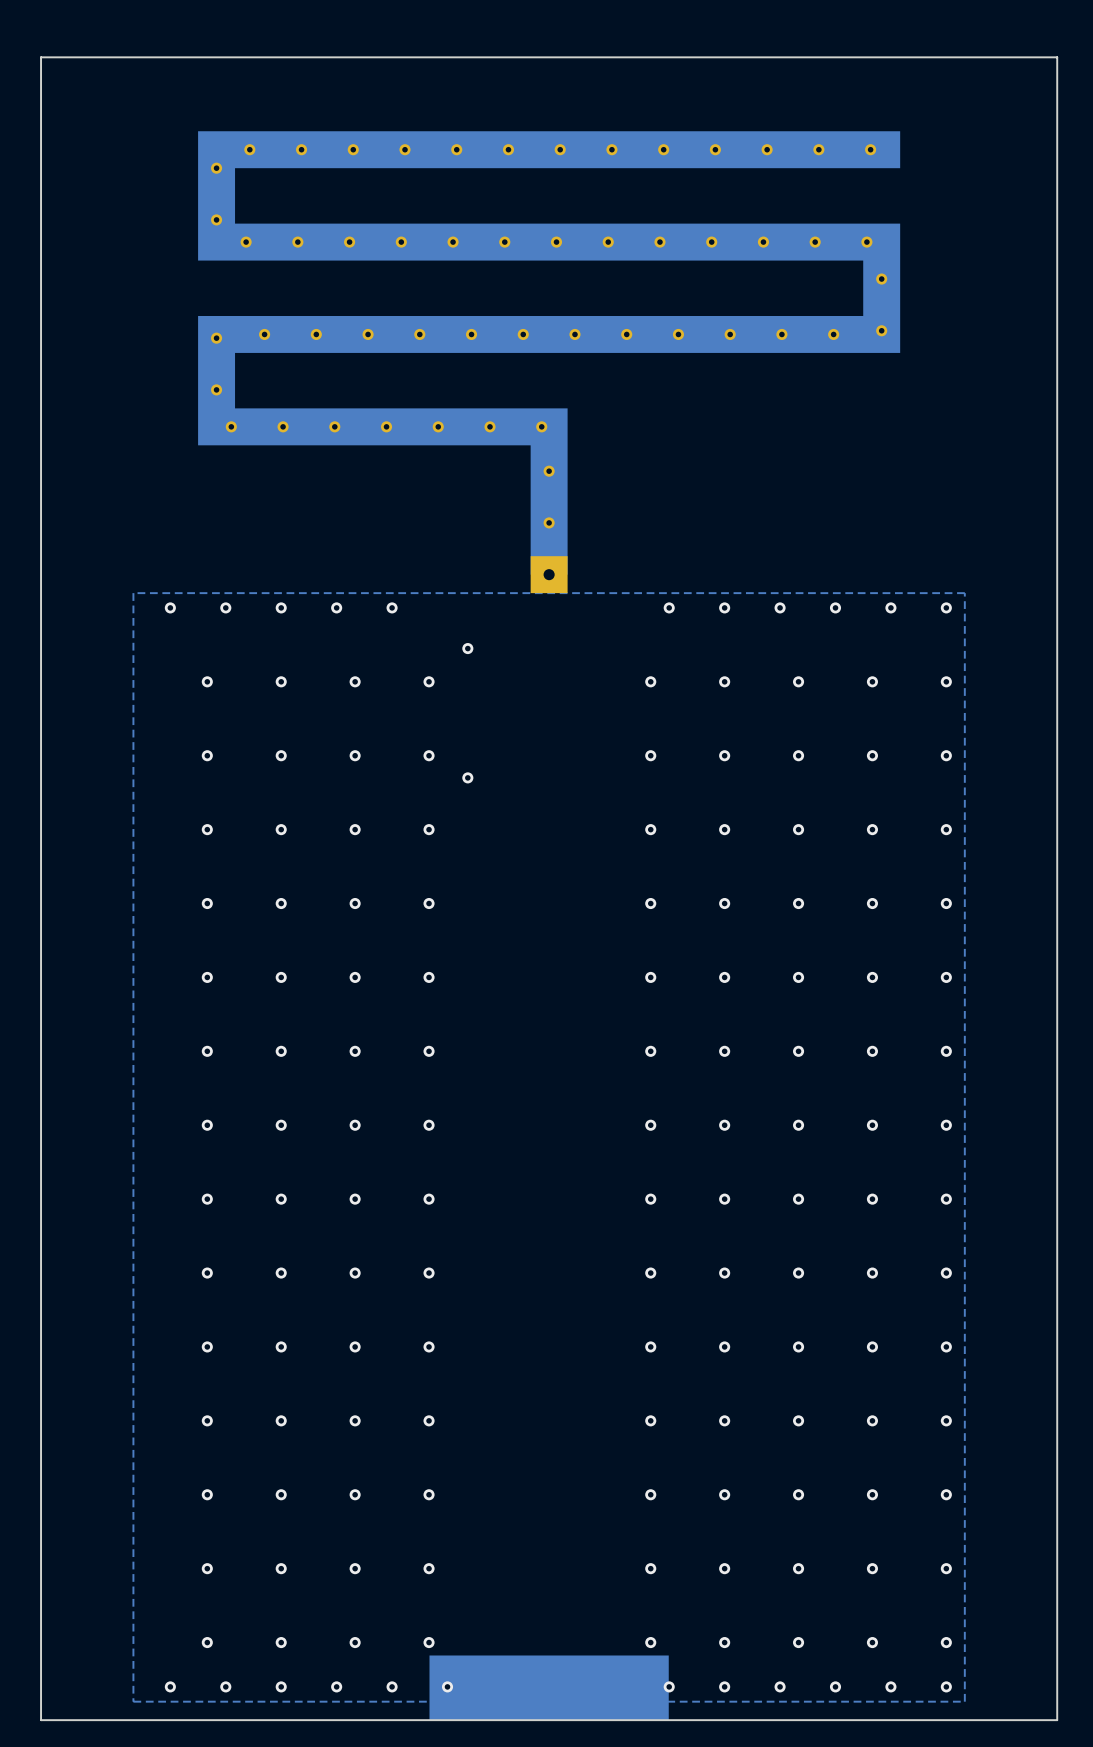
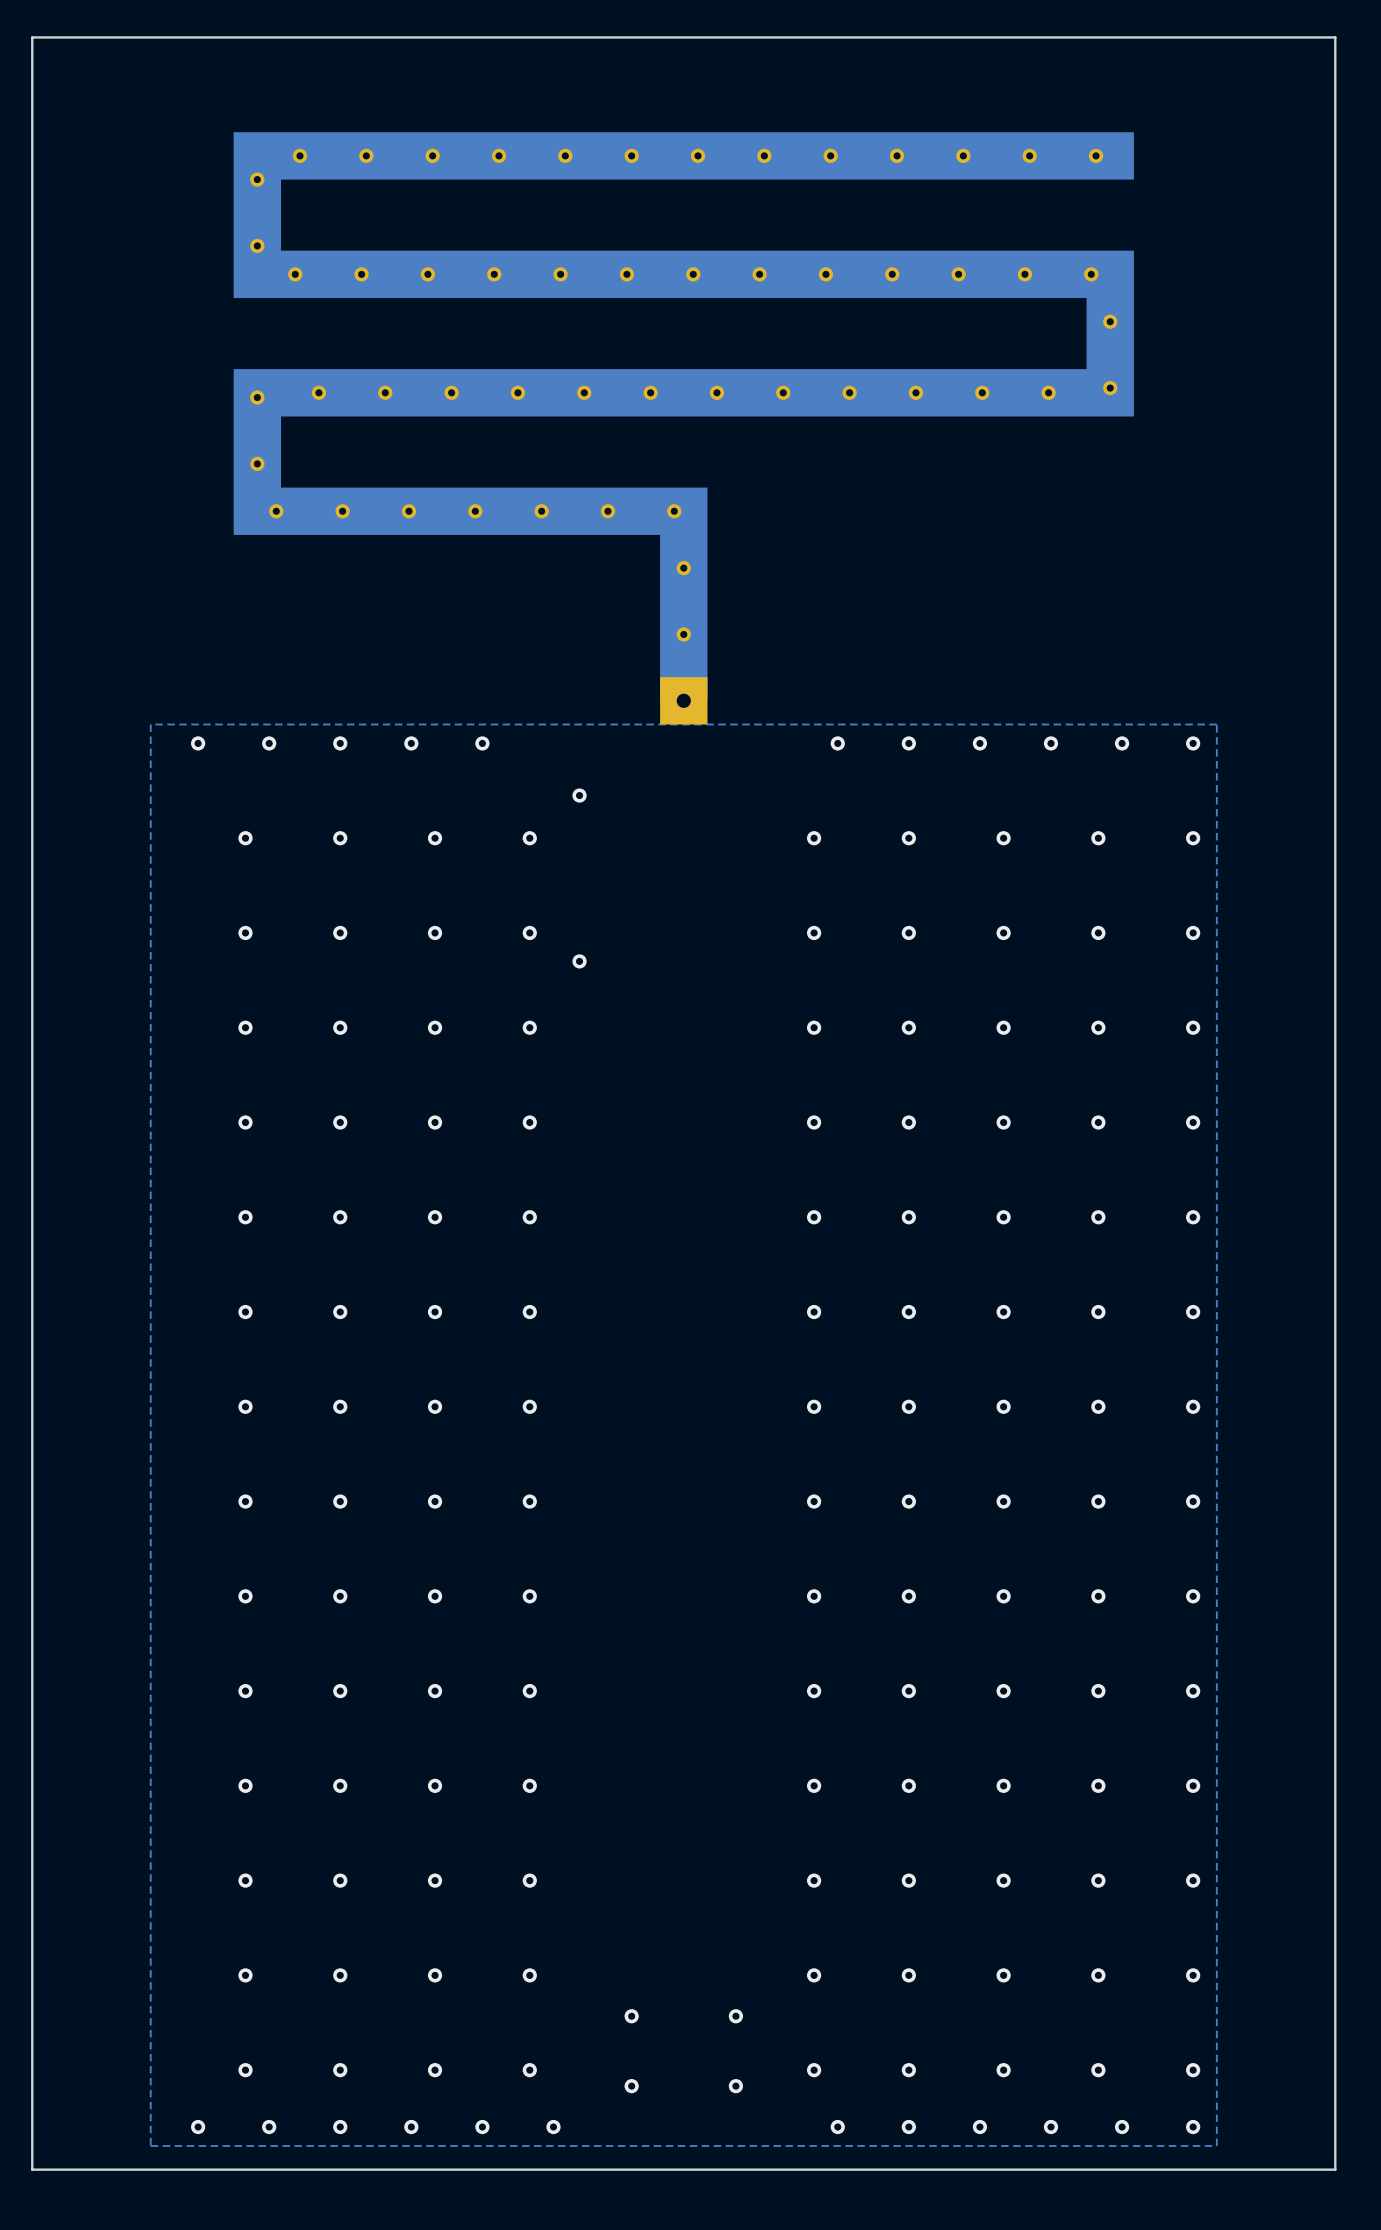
via: none -> (631, 2016)
via: none -> (735, 2016)
via: none -> (631, 2086)
via: none -> (735, 2086)
part: (549, 1687) -> none

